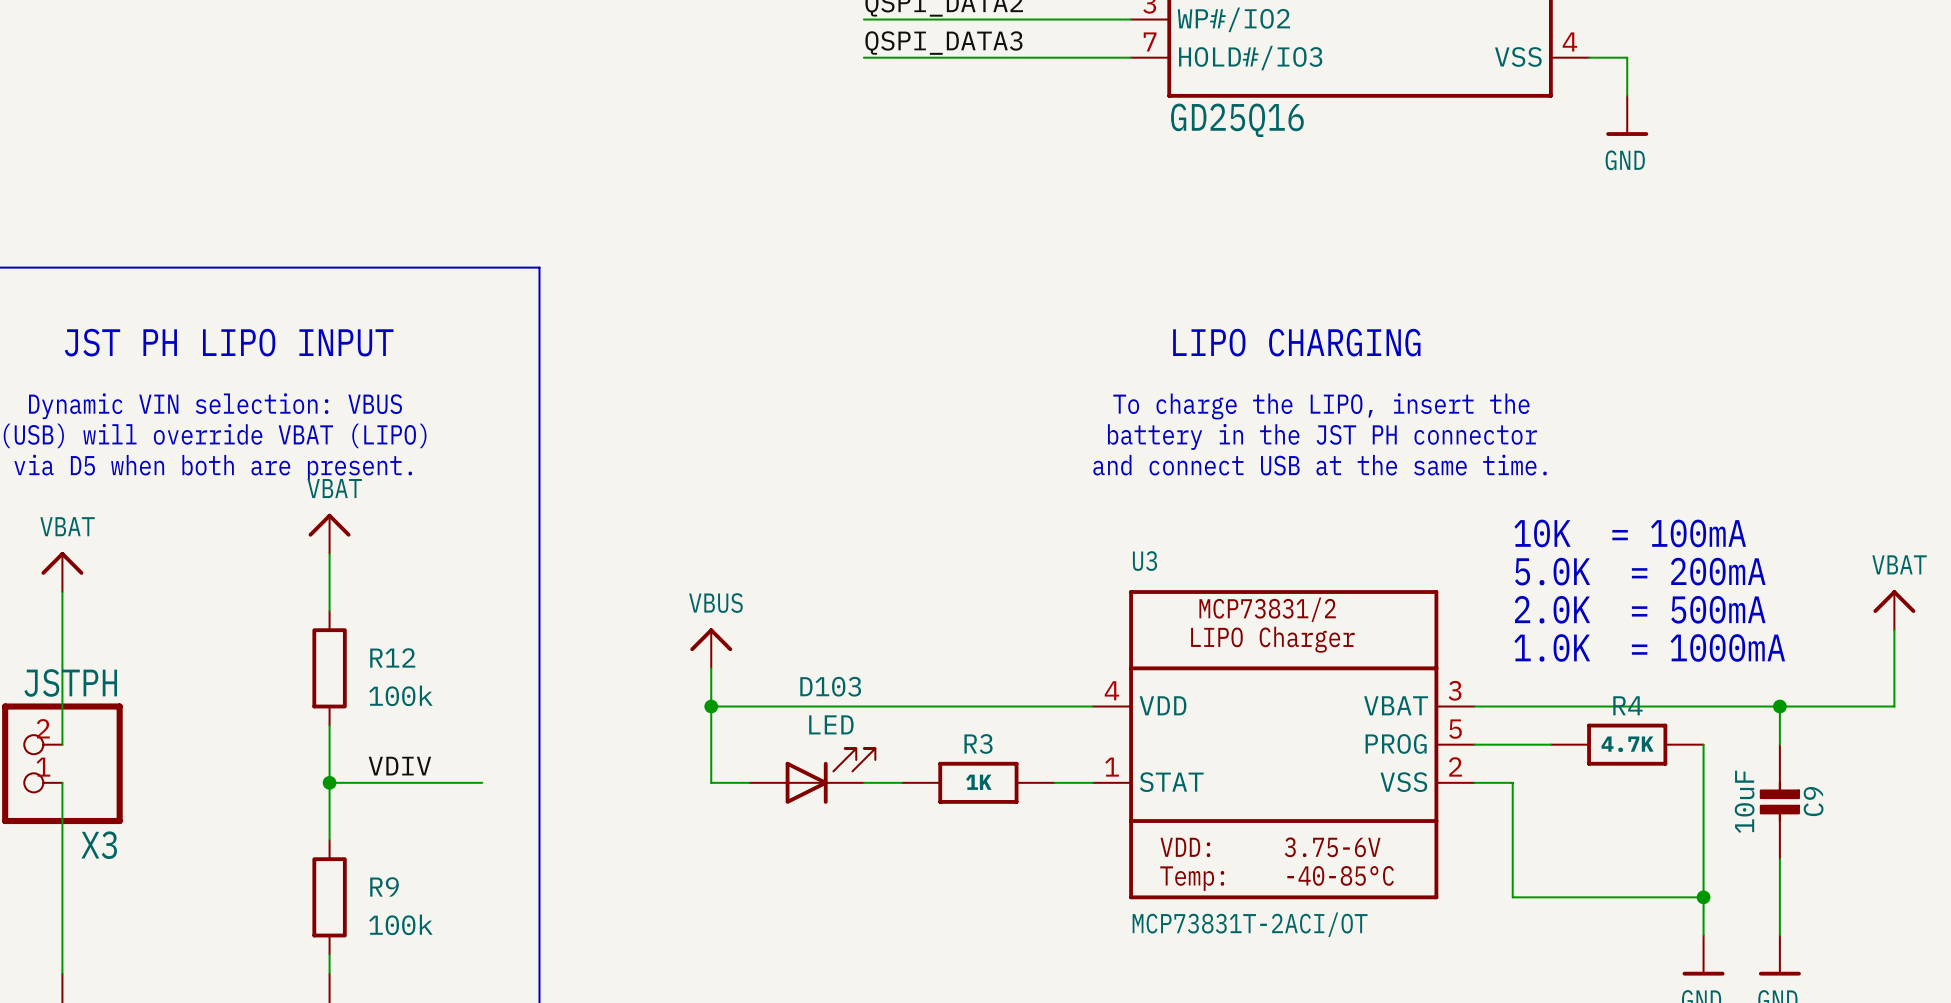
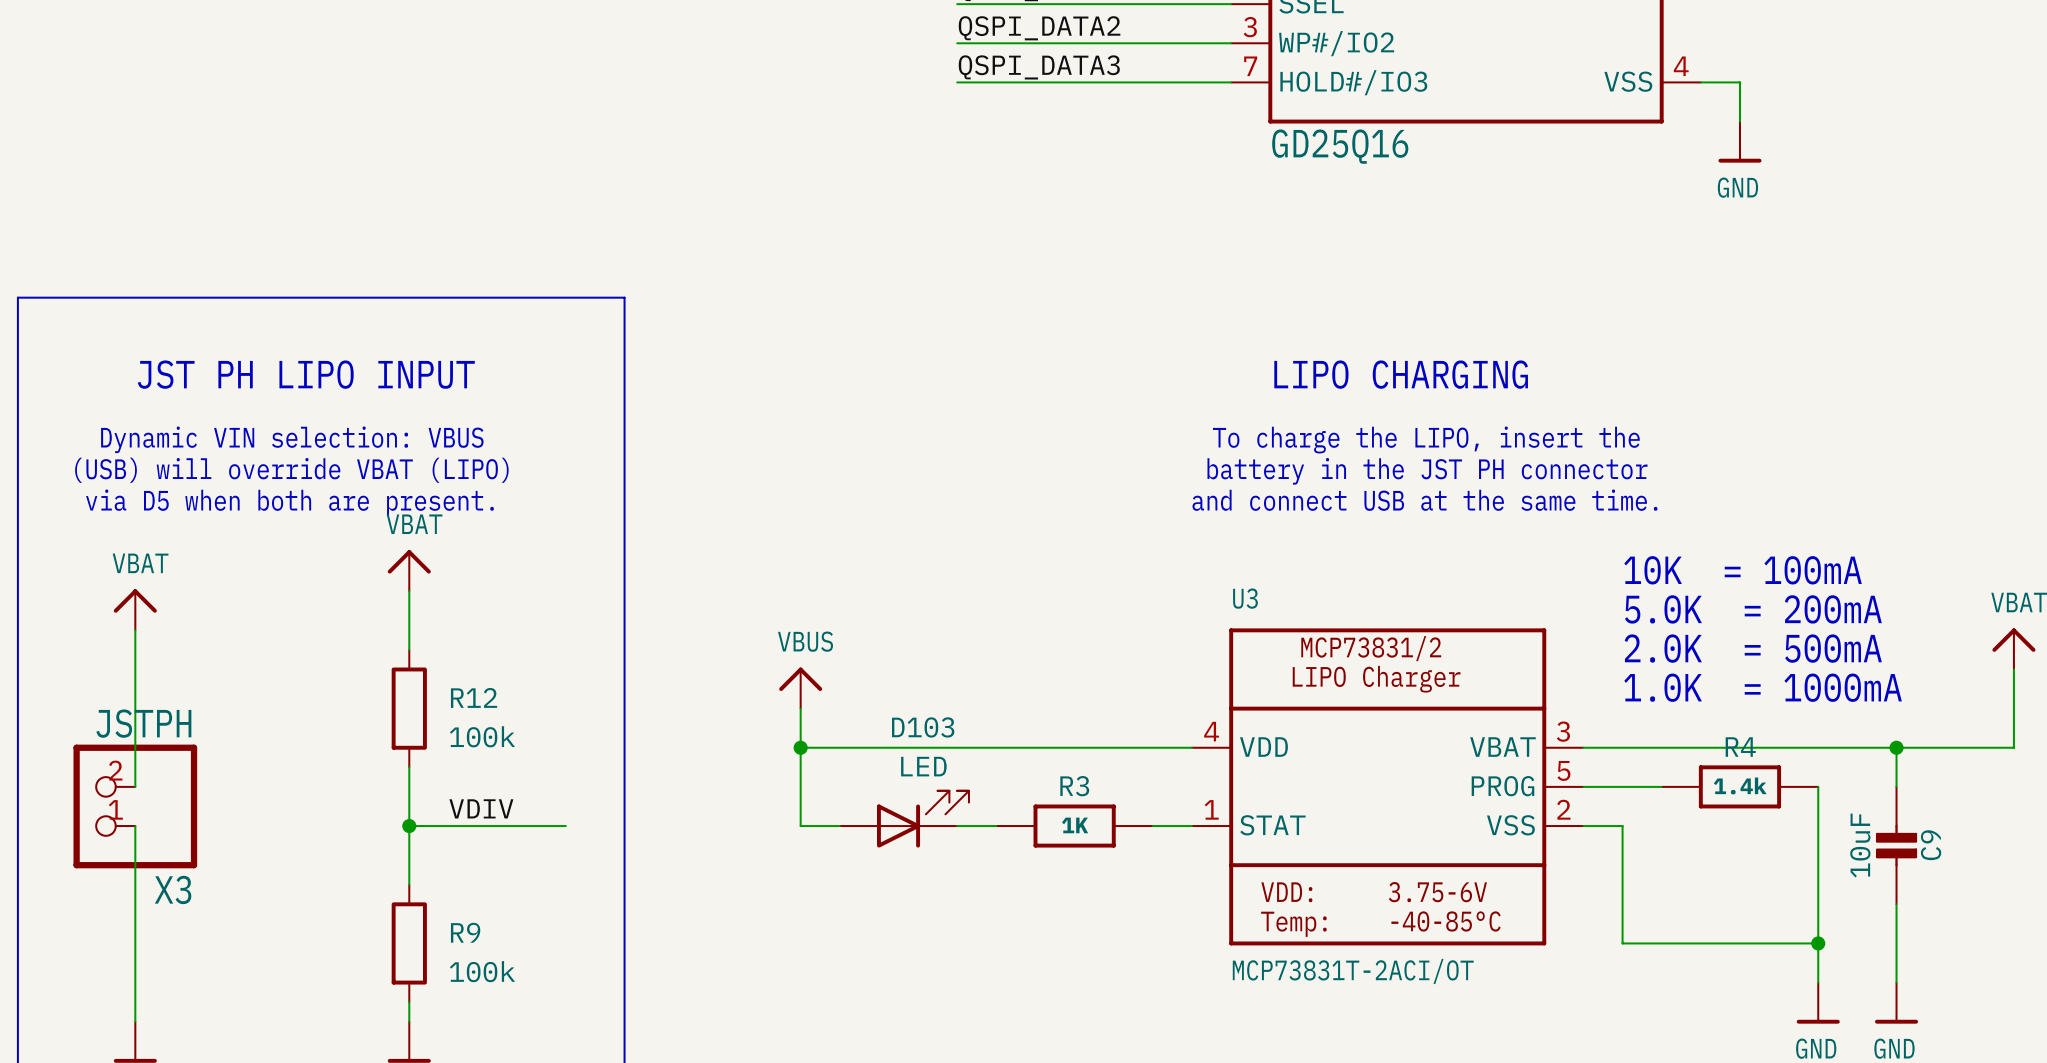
R4 value: 4.7K (1627, 744) -> 1.4k (1740, 785)

